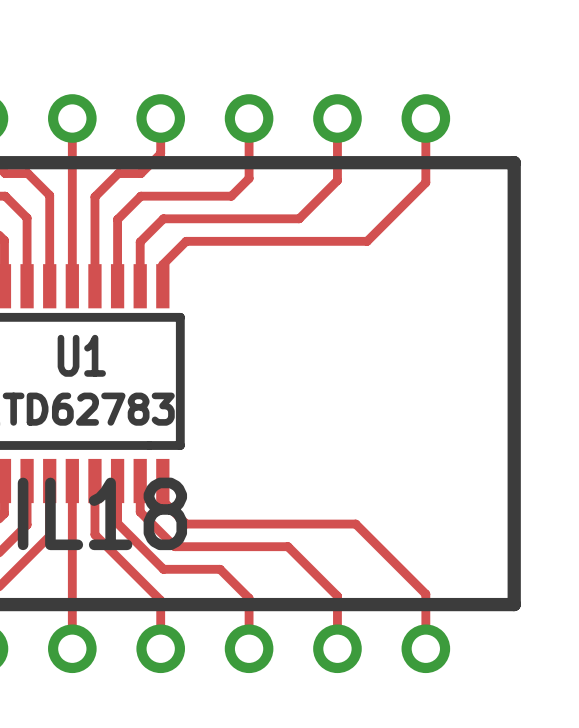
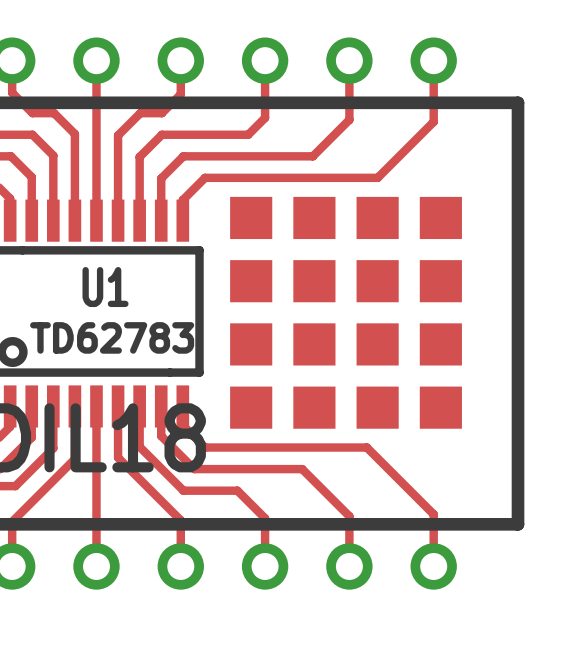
part: none -> (282, 249)
part: none -> (409, 249)
part: none -> (282, 376)
part: none -> (409, 376)

